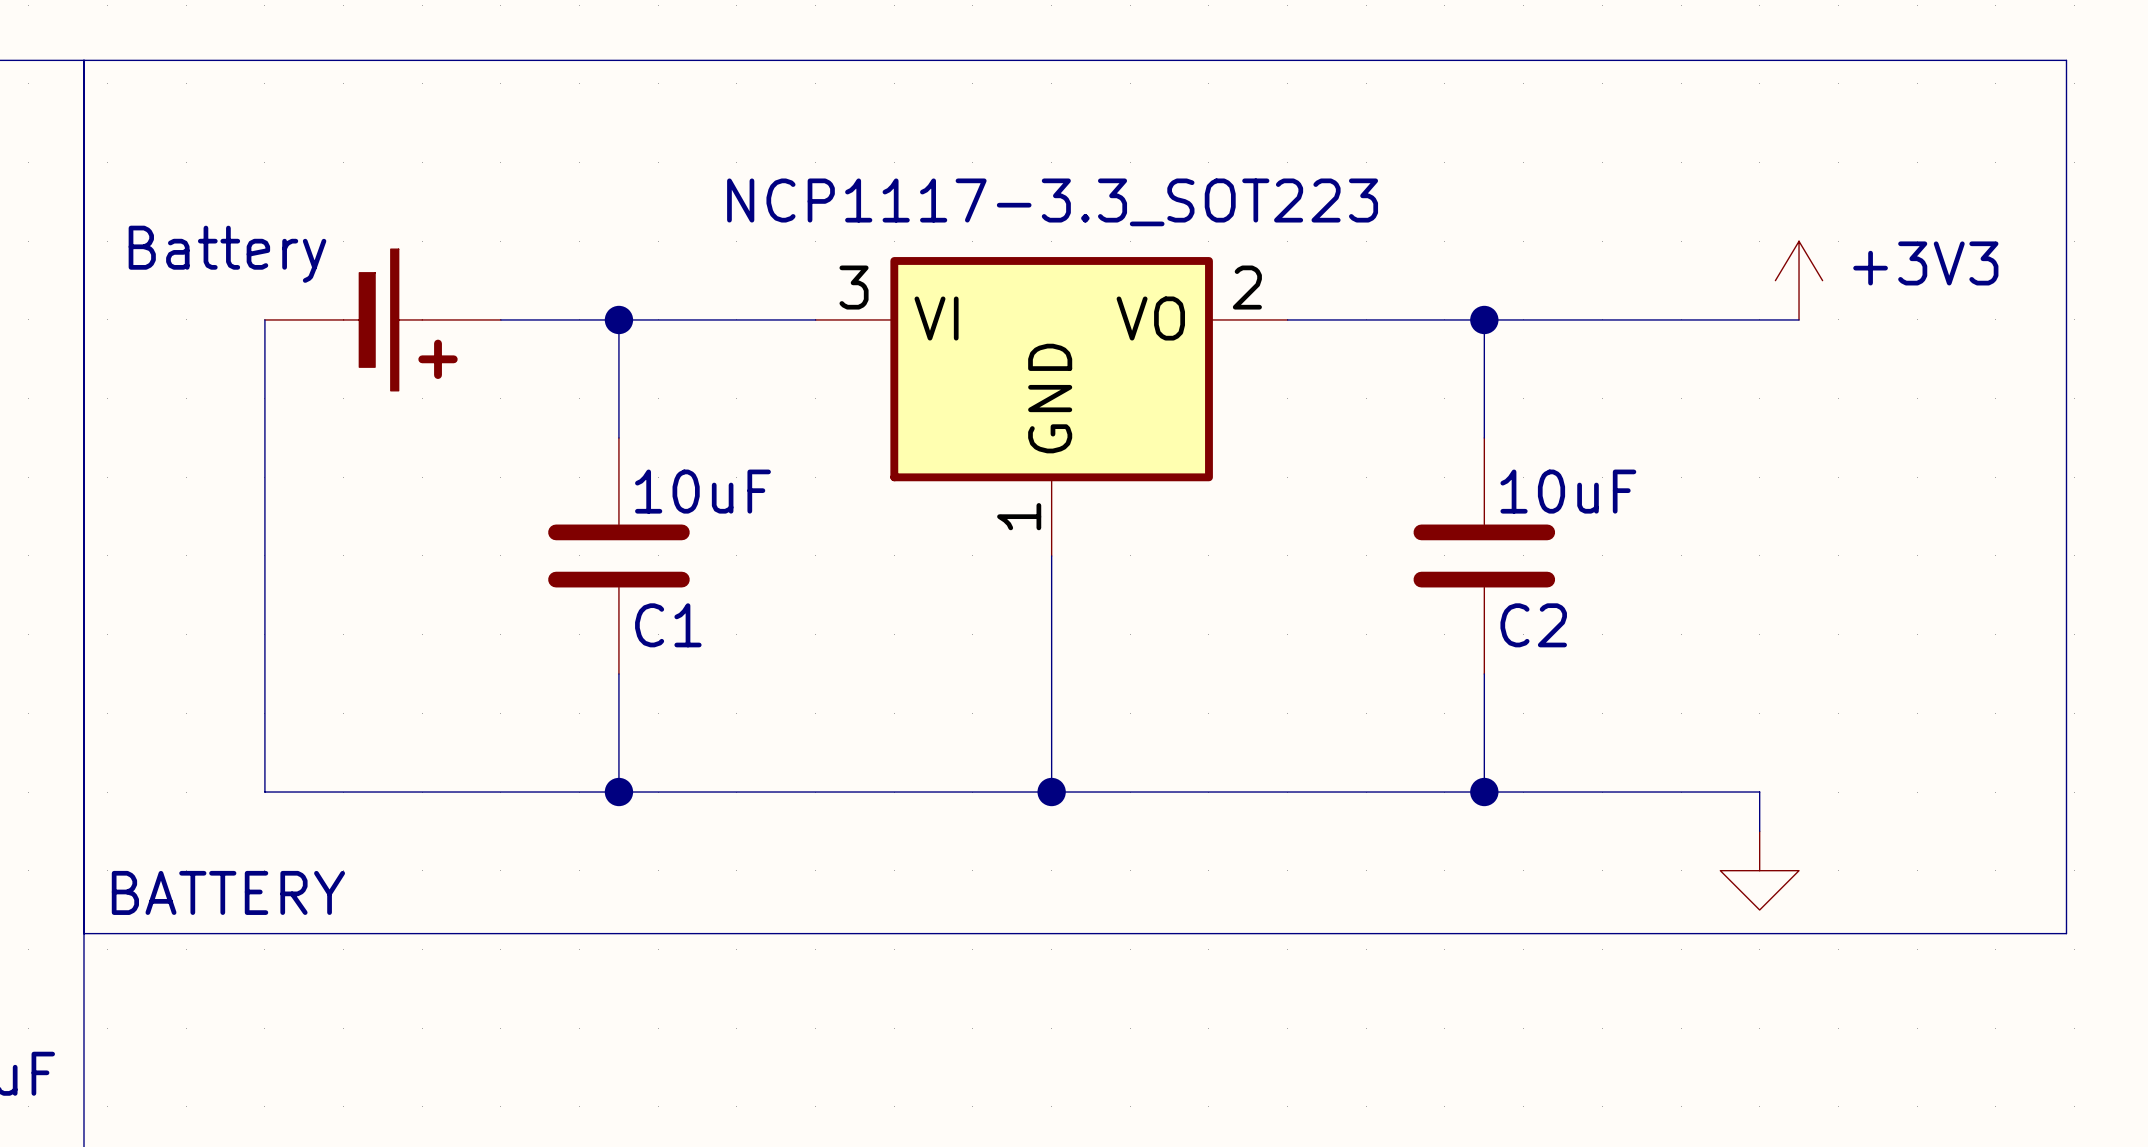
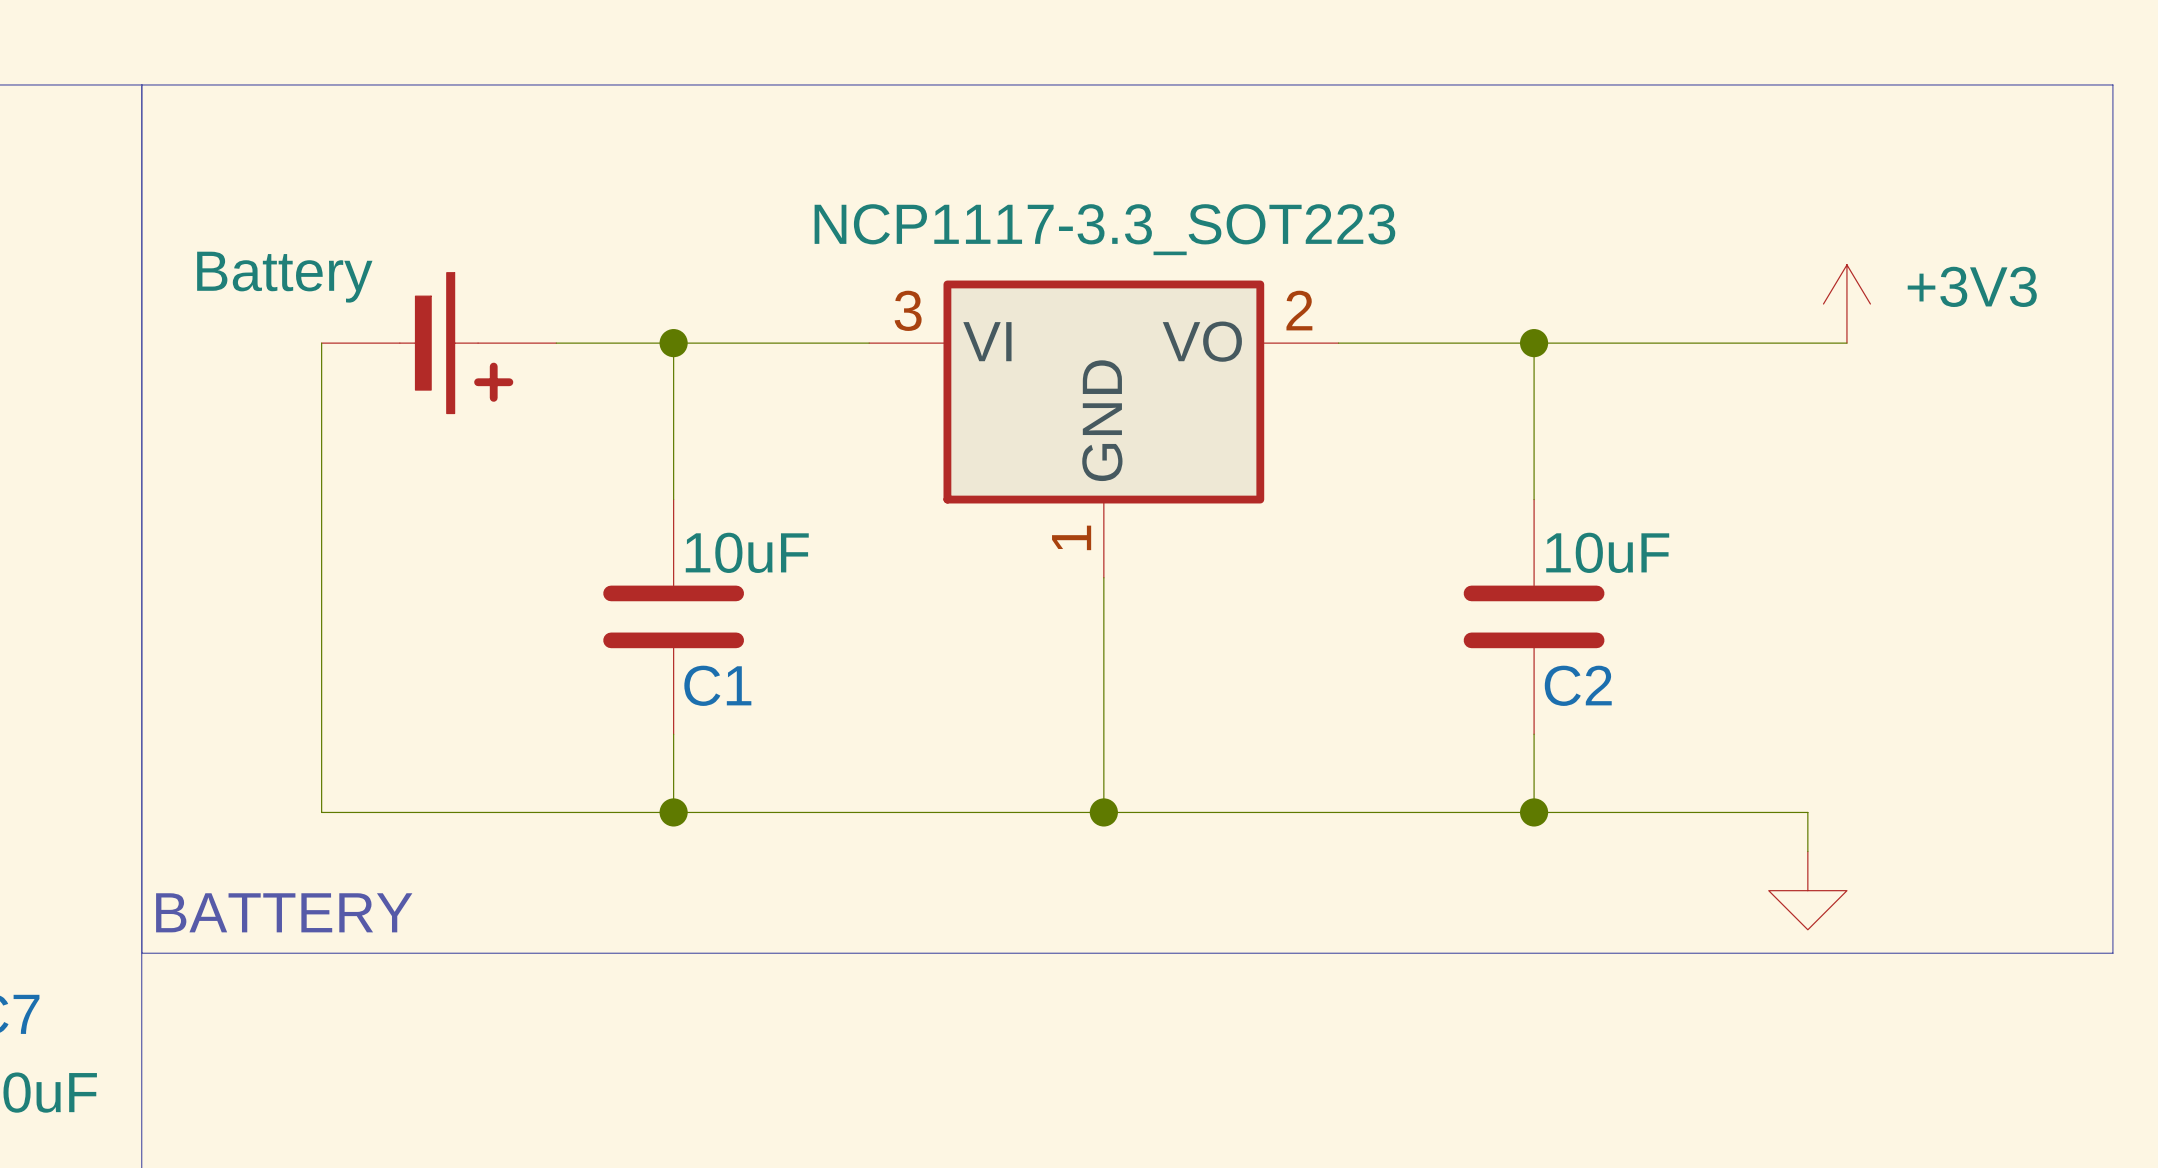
C1 position: (618, 555) -> (673, 616)
C2 position: (1484, 555) -> (1534, 616)

